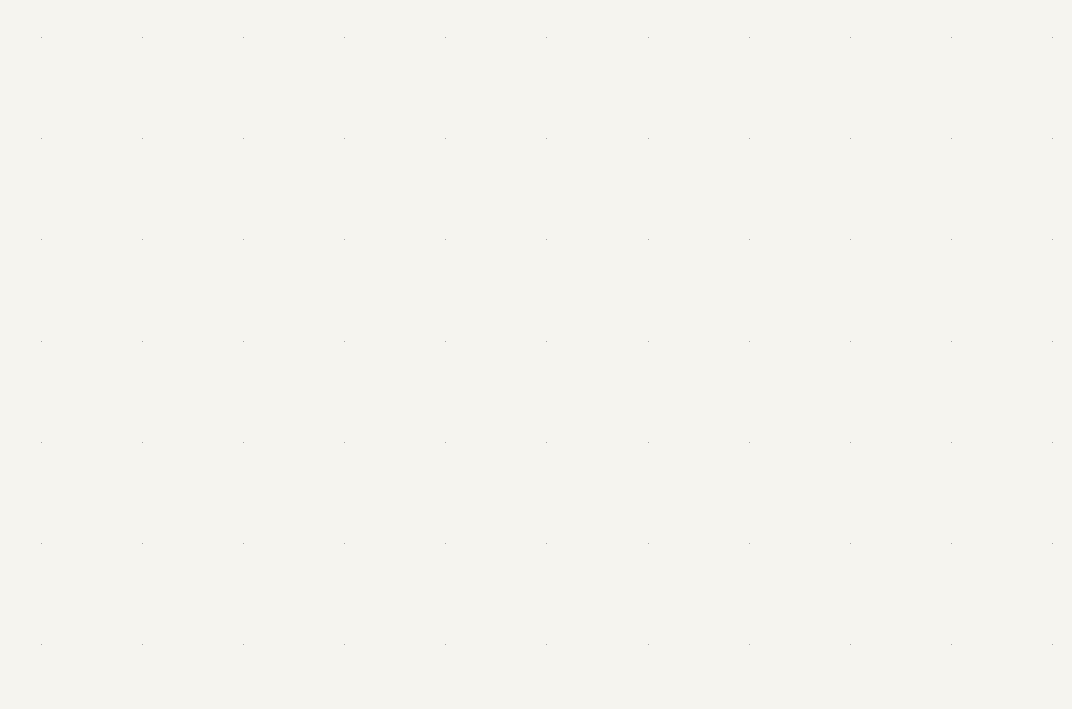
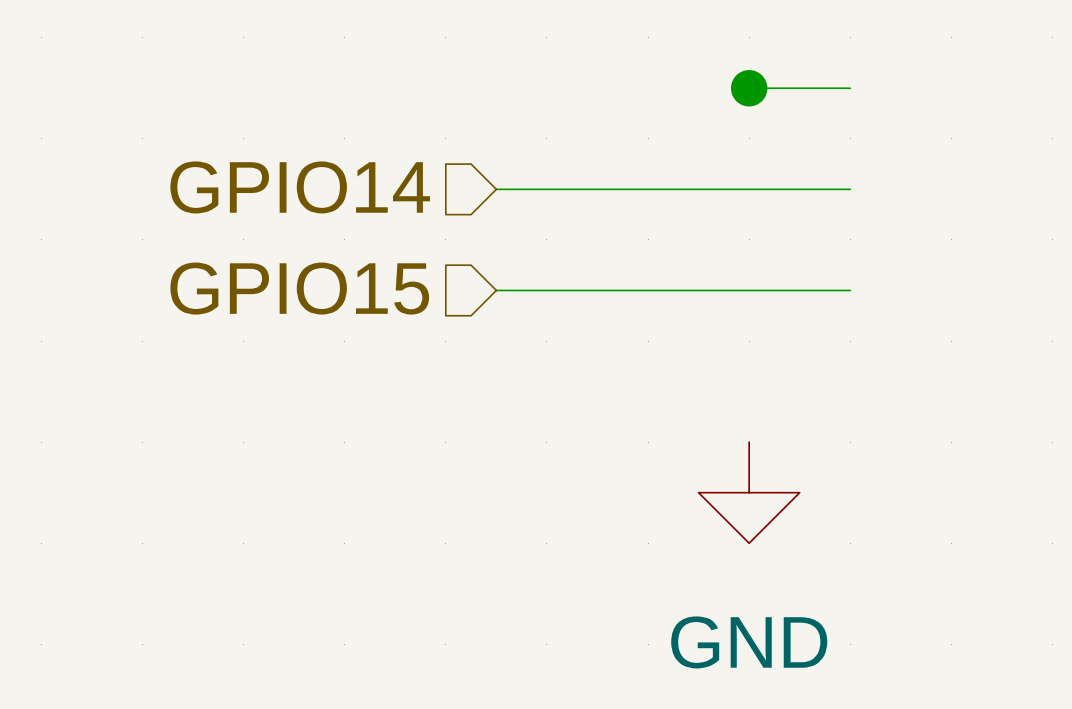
wire: none -> (749, 88) (850, 88)
junction: none -> (749, 88)
hierarchical label: none -> GPIO14 (300, 187)
wire: none -> (496, 189) (850, 189)
hierarchical label: none -> GPIO15 (299, 288)
wire: none -> (496, 290) (850, 290)
power symbol: none -> GND (749, 492)

